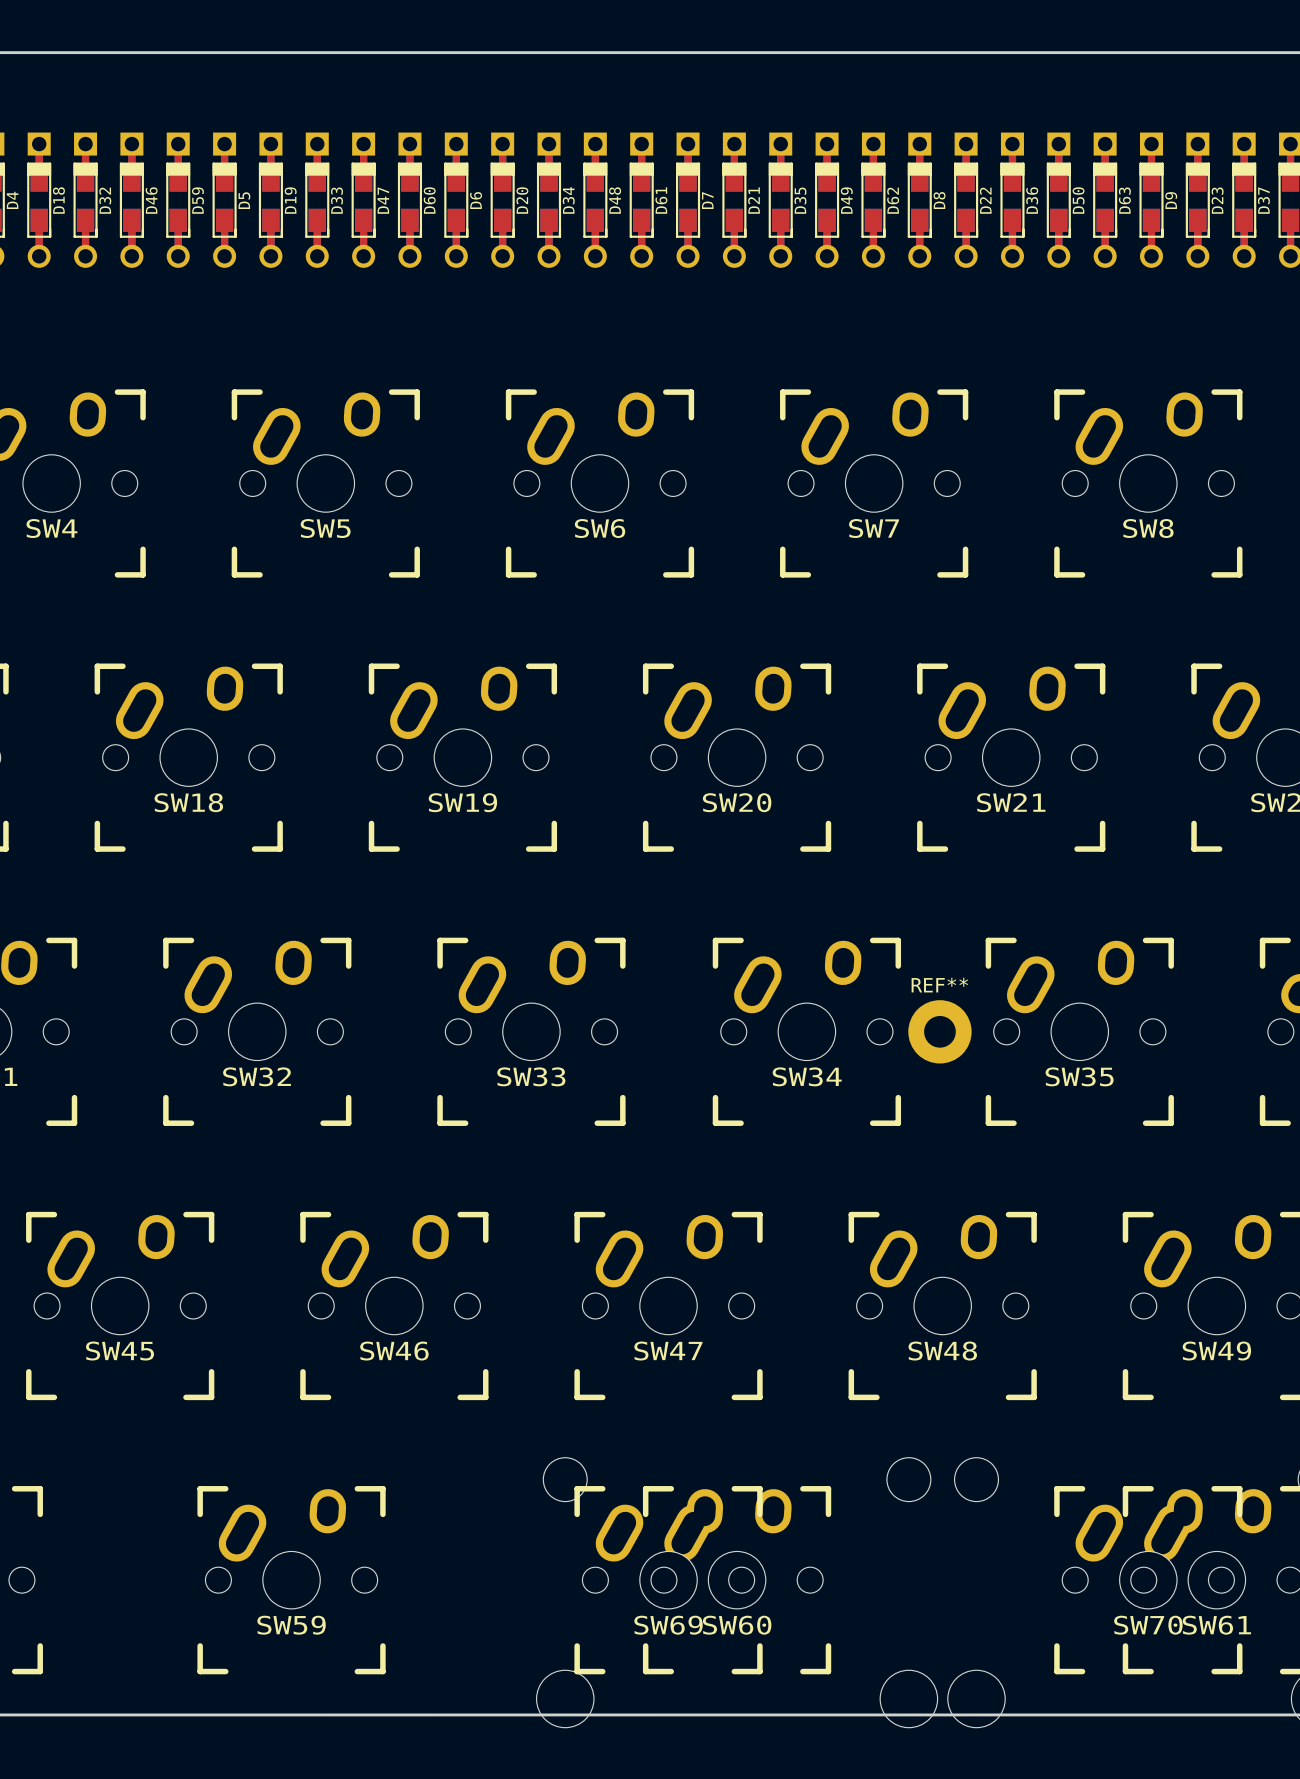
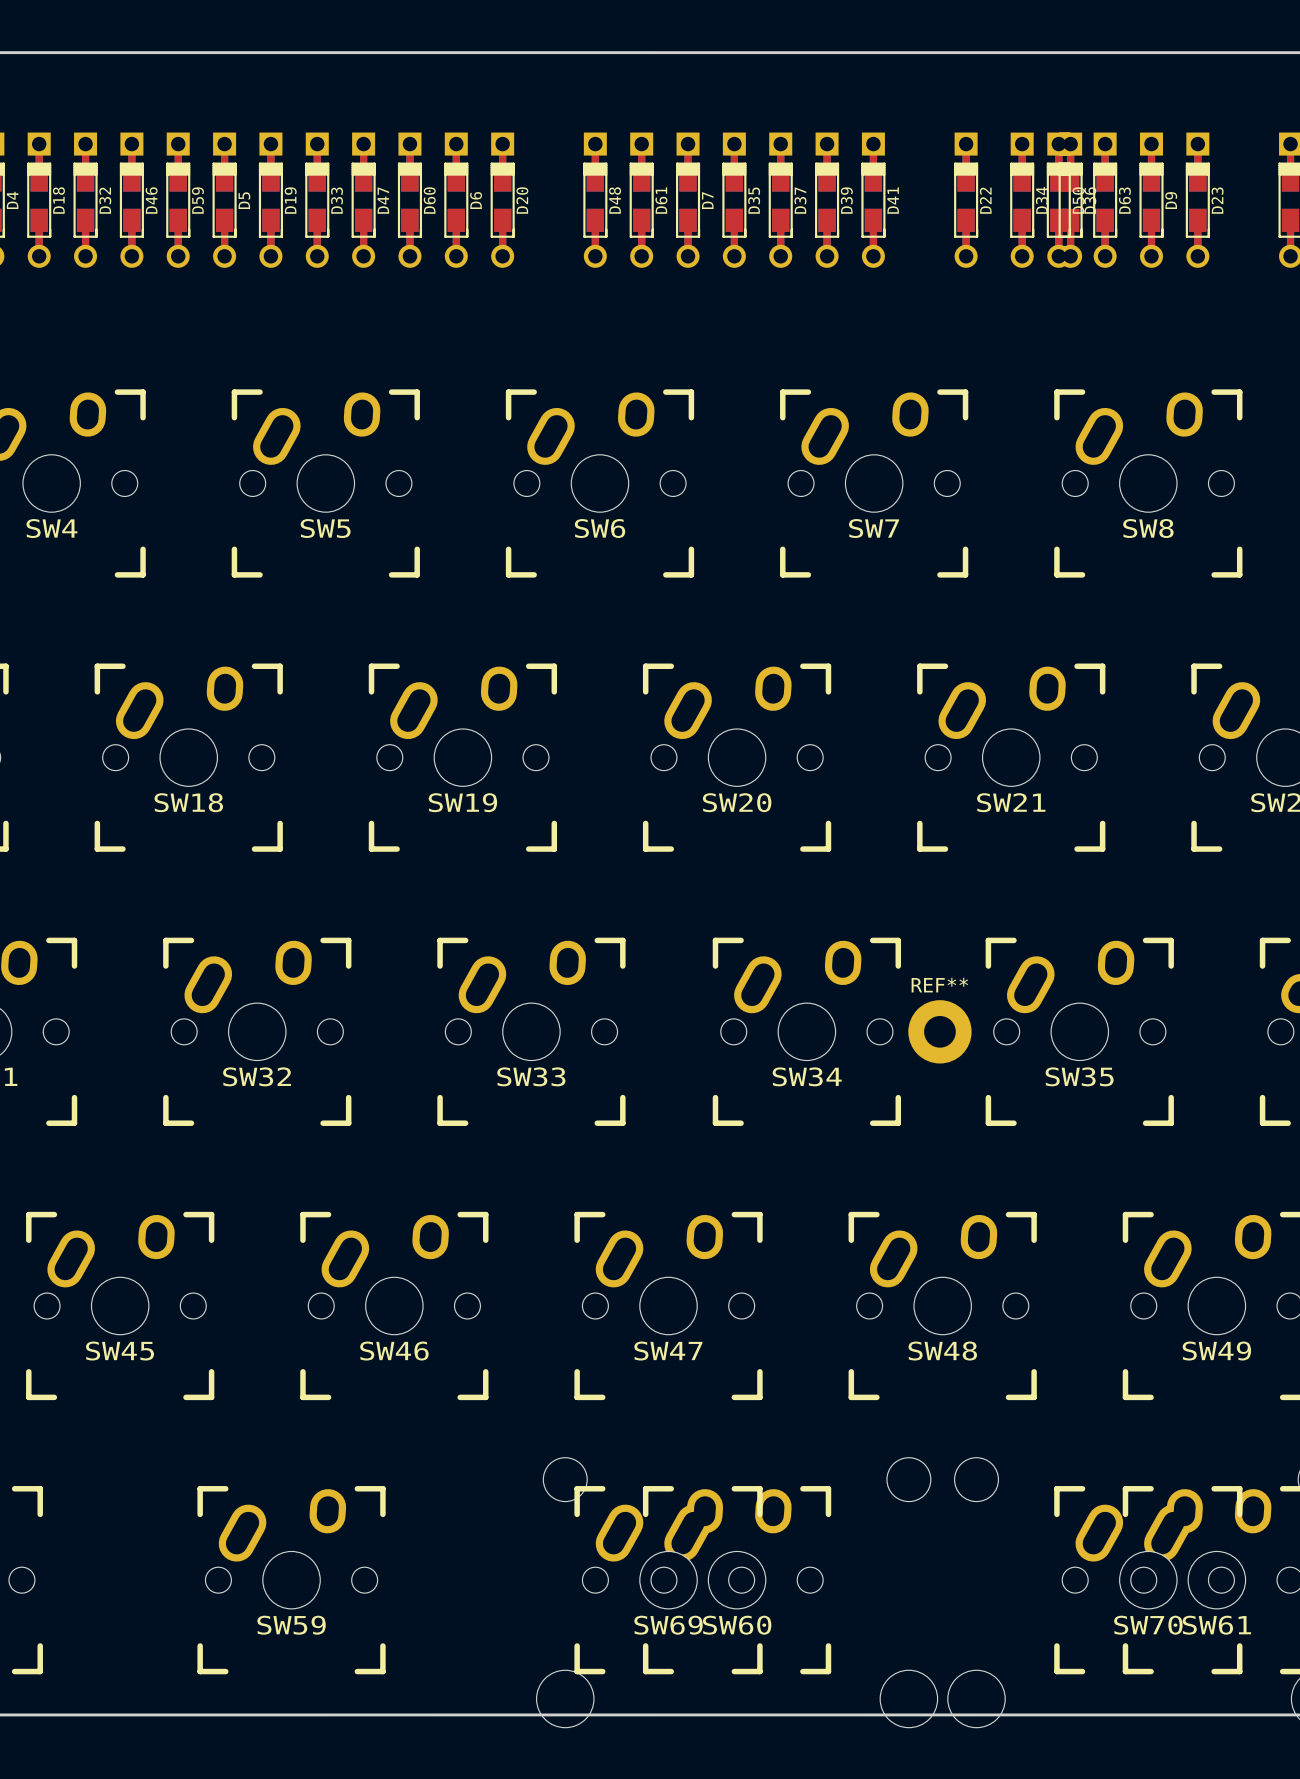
D34 position: (549, 200) -> (1022, 200)
D21 name: D21 (754, 200) -> D35 (754, 200)
D35 name: D35 (800, 200) -> D37 (800, 200)
D49 name: D49 (846, 200) -> D39 (846, 200)
D62 name: D62 (893, 200) -> D41 (893, 200)
D8: (919, 200) -> none
D36 position: (1012, 200) -> (1070, 200)
D37: (1244, 200) -> none

